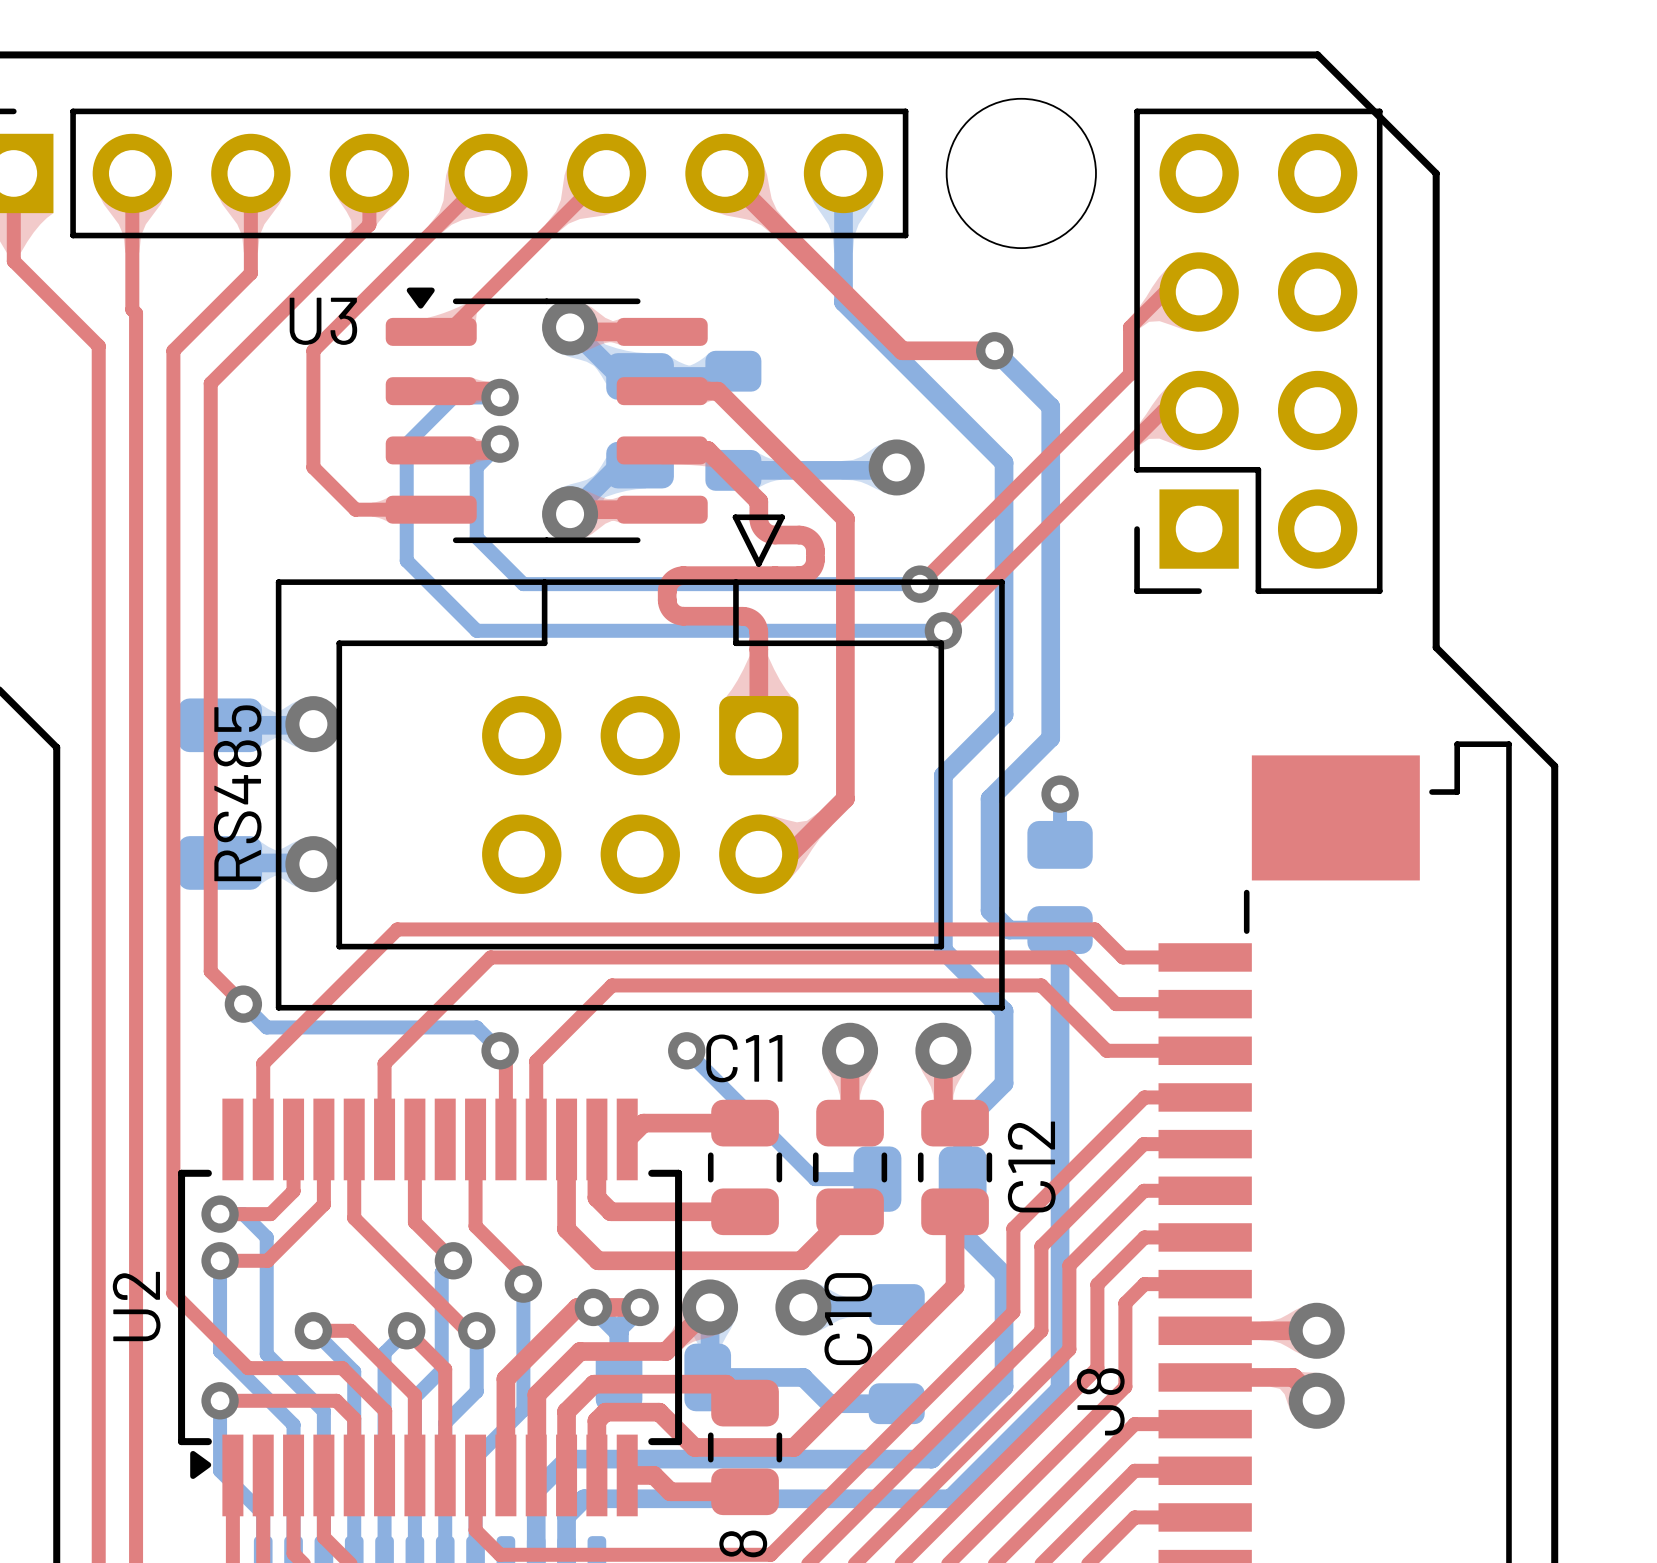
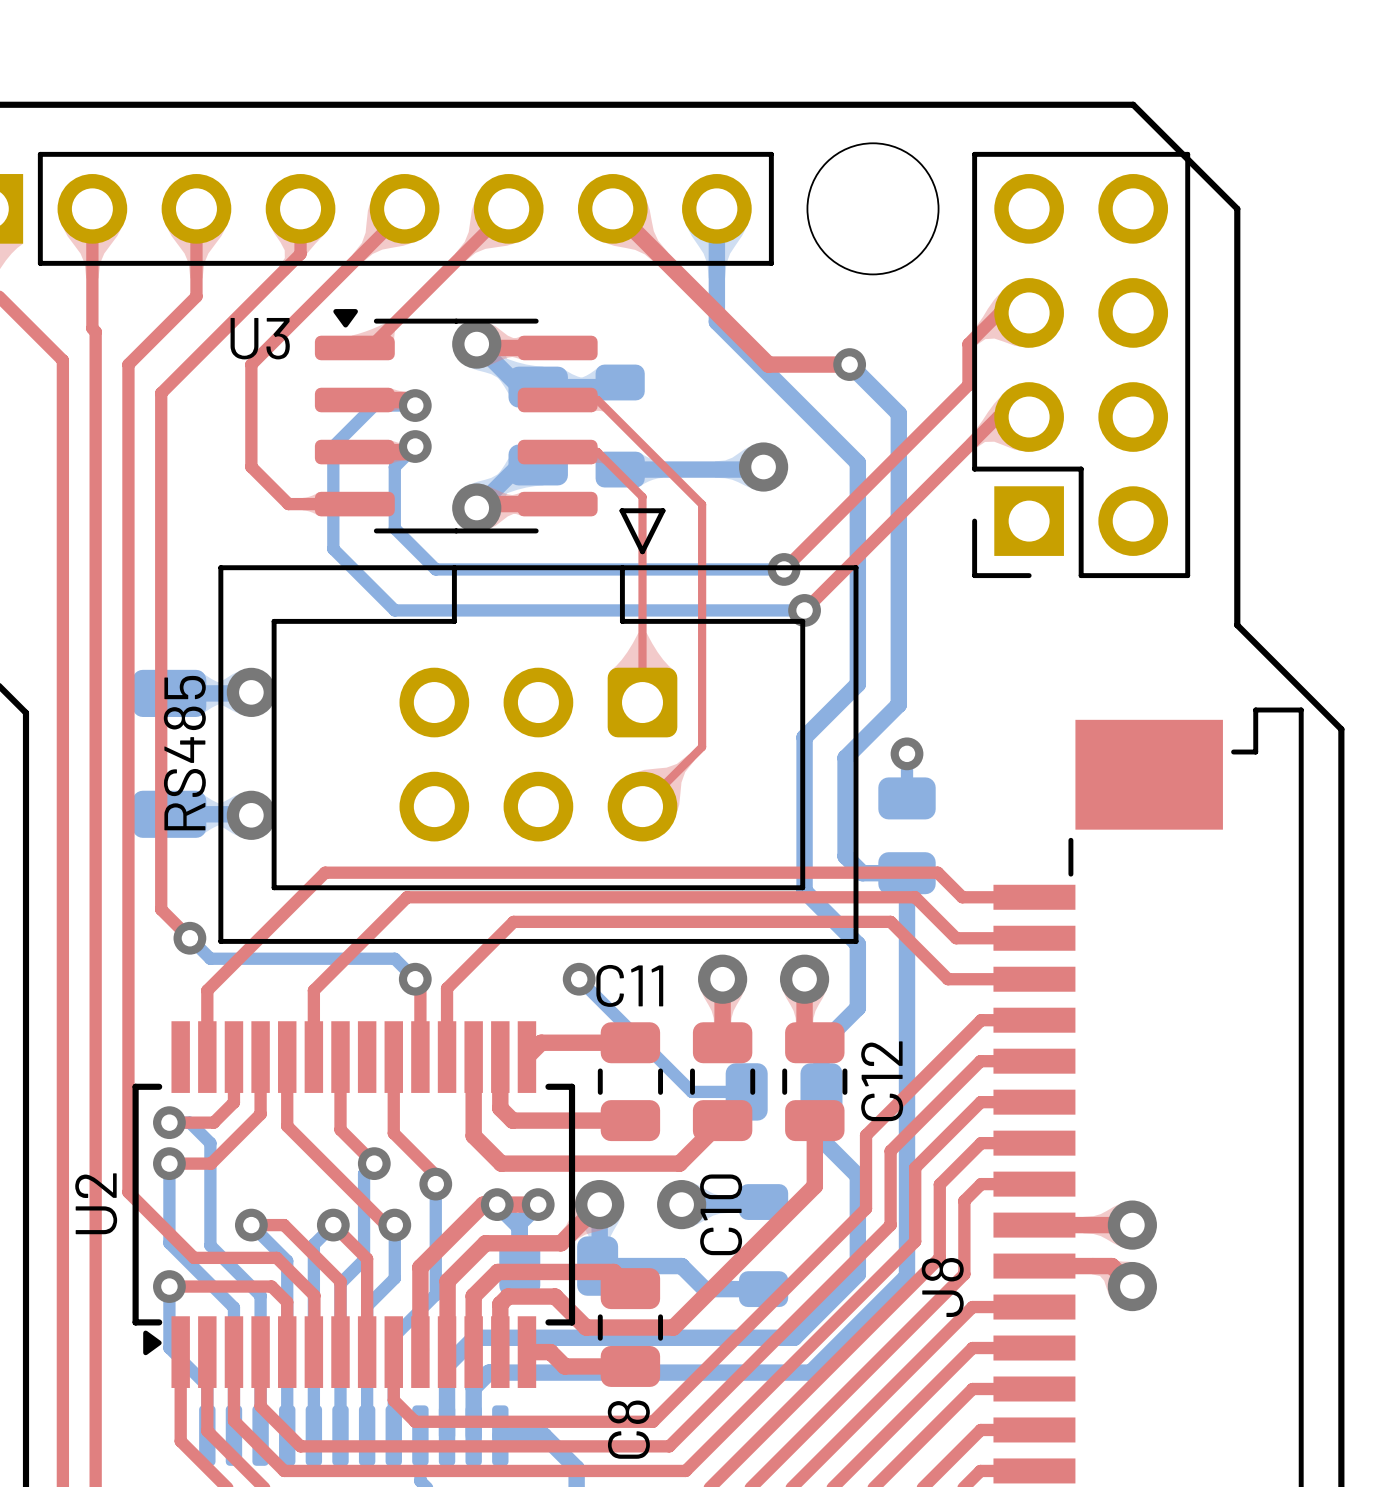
top track: (707, 391) (717, 391) (845, 518) (845, 798) (789, 854) (758, 854) -> (597, 400) (702, 504) (702, 746) (642, 806)
top track width: thick (662, 450) (707, 450) (758, 501) (758, 518) -> thin (557, 452) (597, 452) (642, 496) (642, 512)
top track: (758, 518) (761, 526) (768, 533) (801, 535) (810, 539) (814, 547) (815, 559) (810, 570) (799, 575) (681, 575) (670, 581) (667, 591) (668, 606) (677, 614) (746, 616) (755, 622) (758, 632) -> (642, 512) (642, 611)
top track width: thick (758, 632) (758, 735) -> thin (642, 611) (642, 702)

